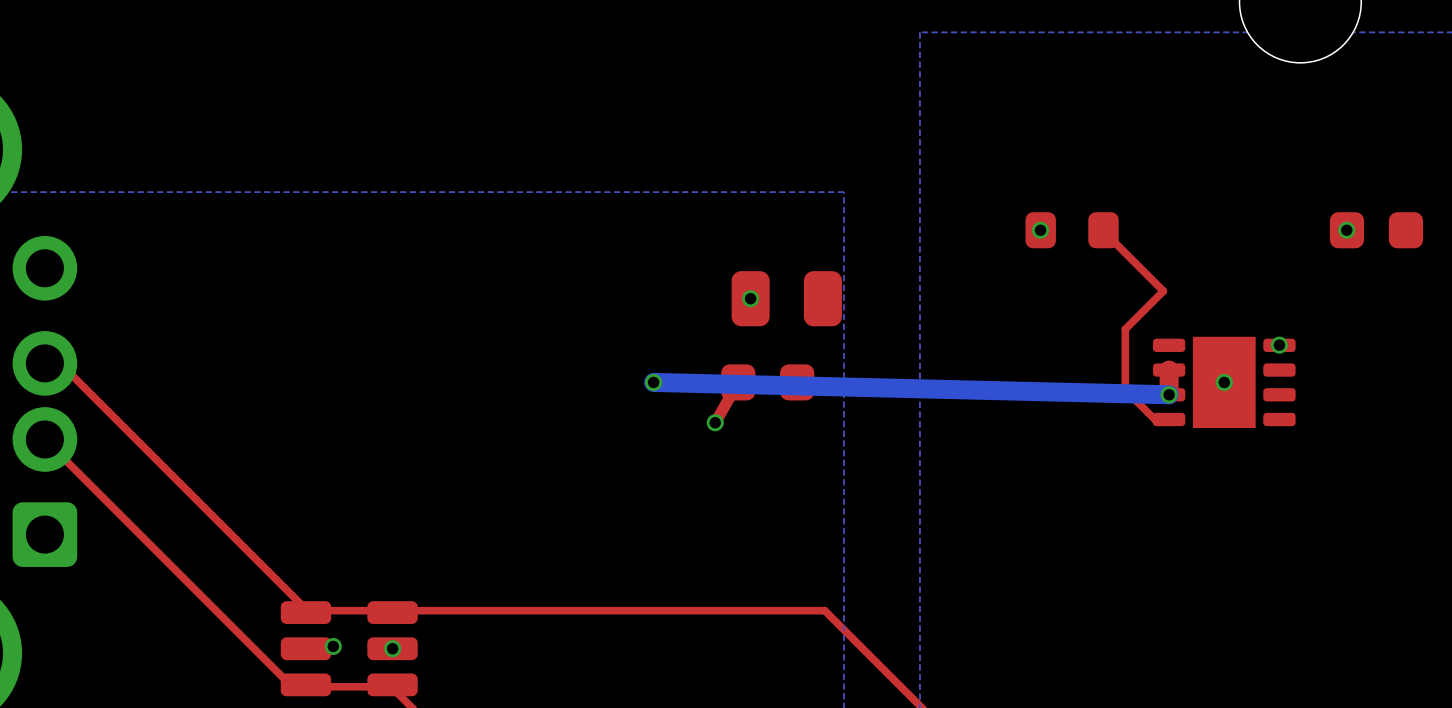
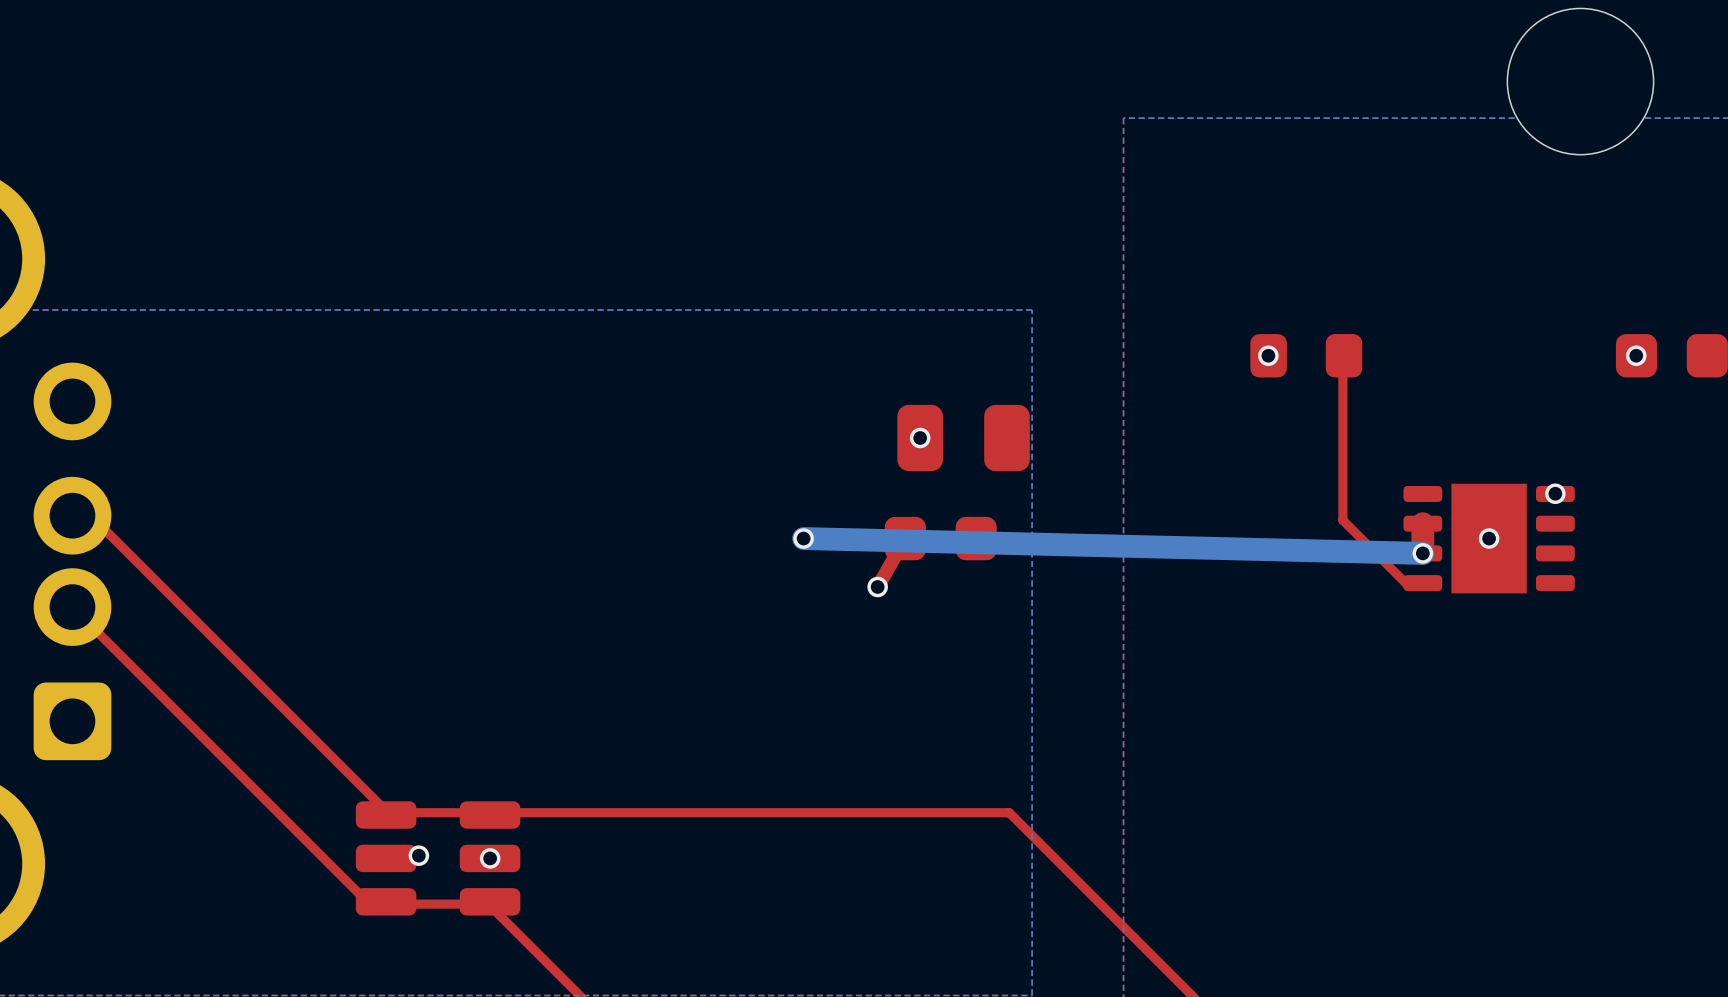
top track: (1102, 230) (1163, 291) (1125, 329) (1125, 390) -> (1342, 355) (1342, 520) (1370, 547)

